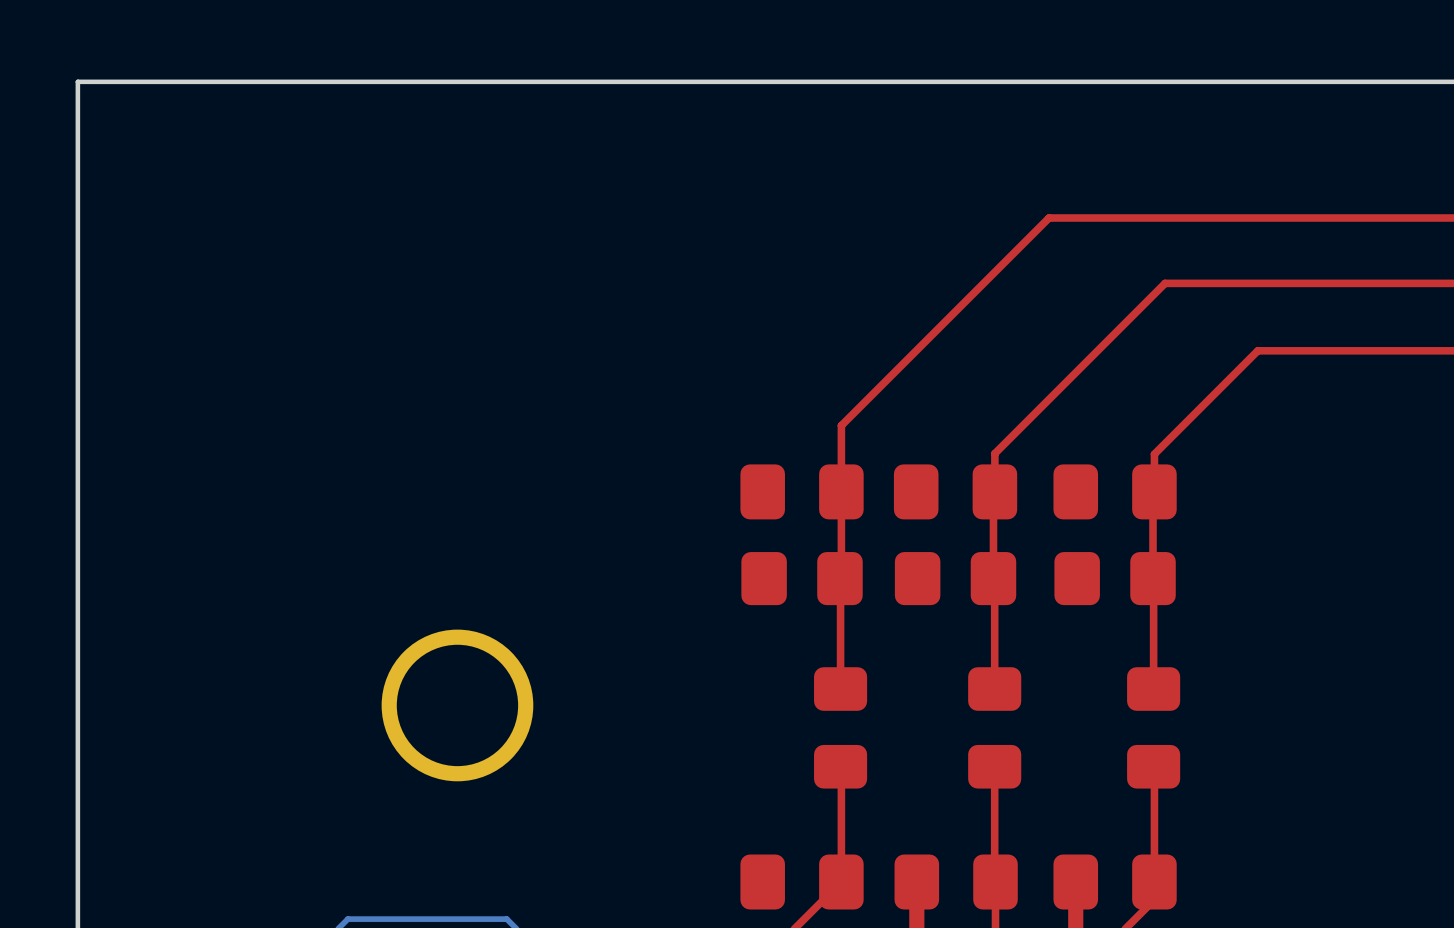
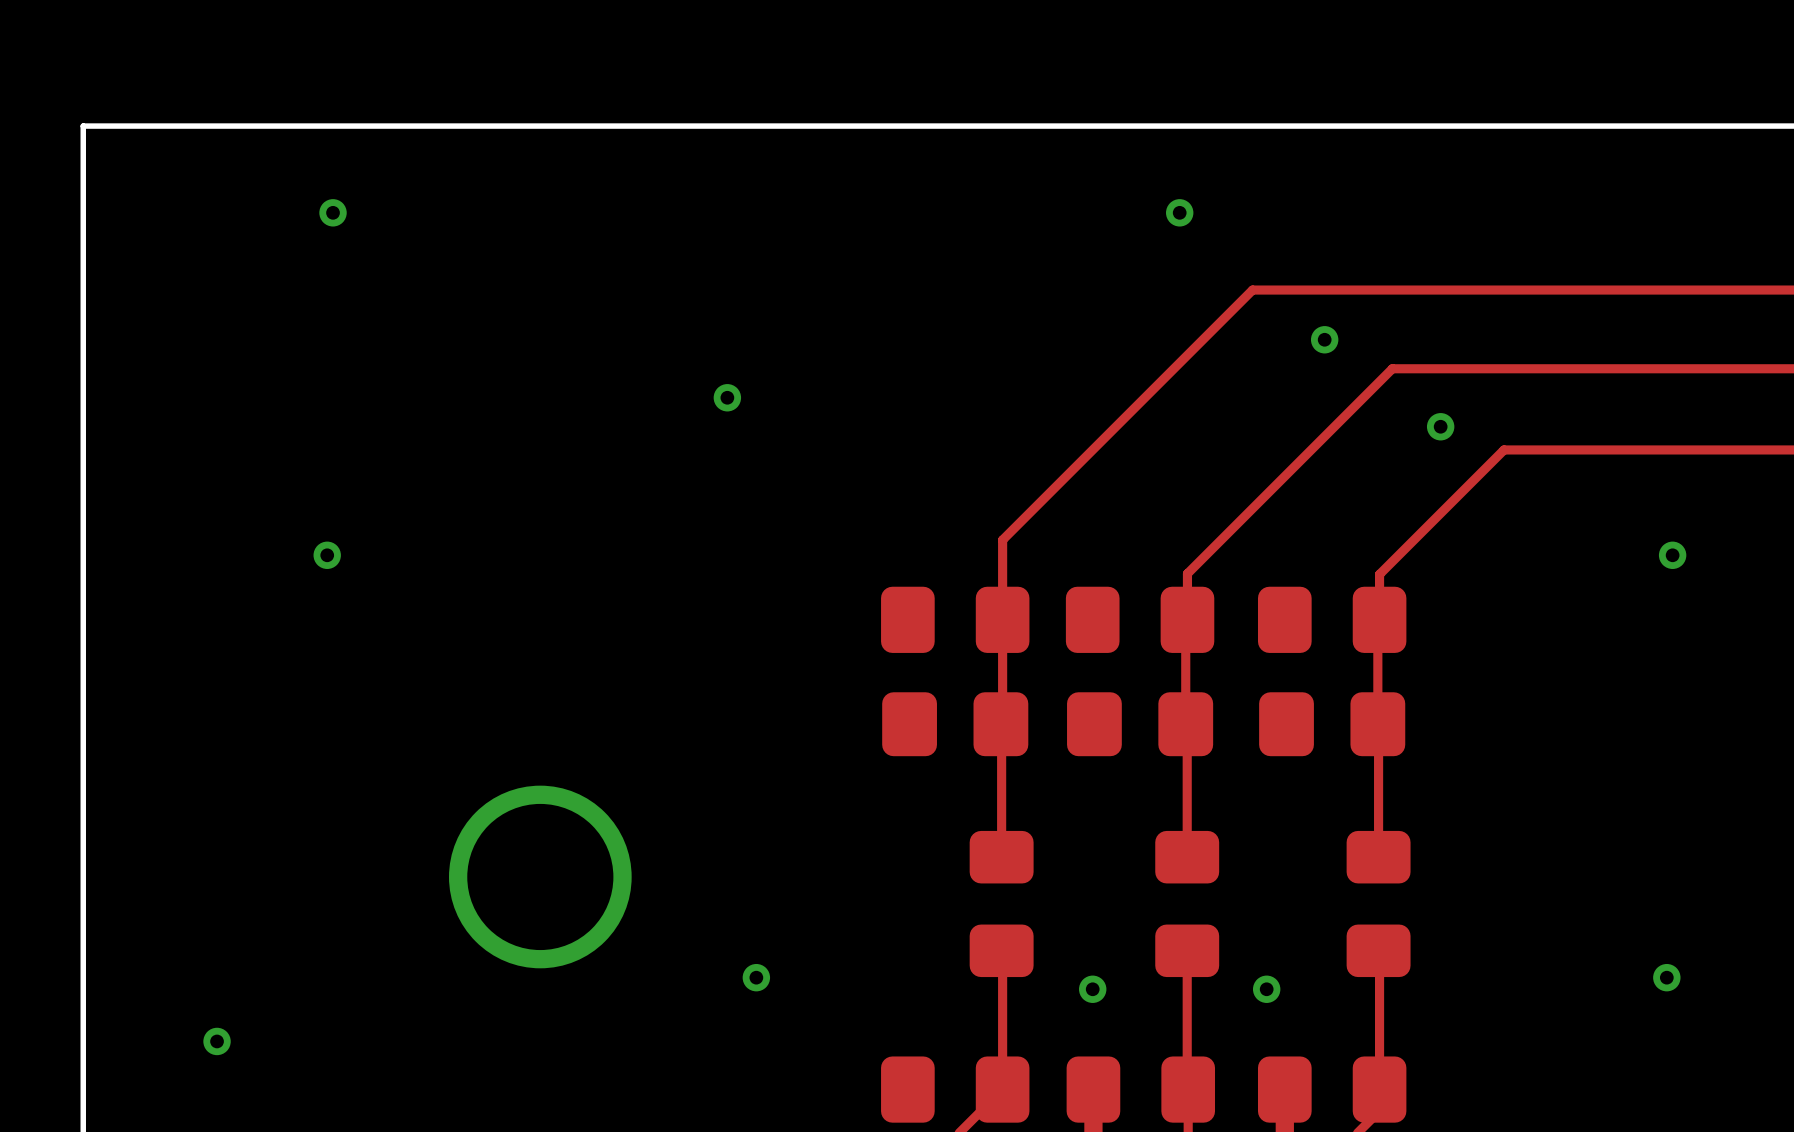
via: none -> (333, 212)
via: none -> (1179, 212)
via: none -> (1324, 339)
via: none -> (727, 397)
via: none -> (1440, 426)
via: none -> (327, 555)
via: none -> (1672, 555)
via: none -> (756, 977)
via: none -> (1666, 977)
via: none -> (1092, 989)
via: none -> (1266, 989)
via: none -> (217, 1041)

